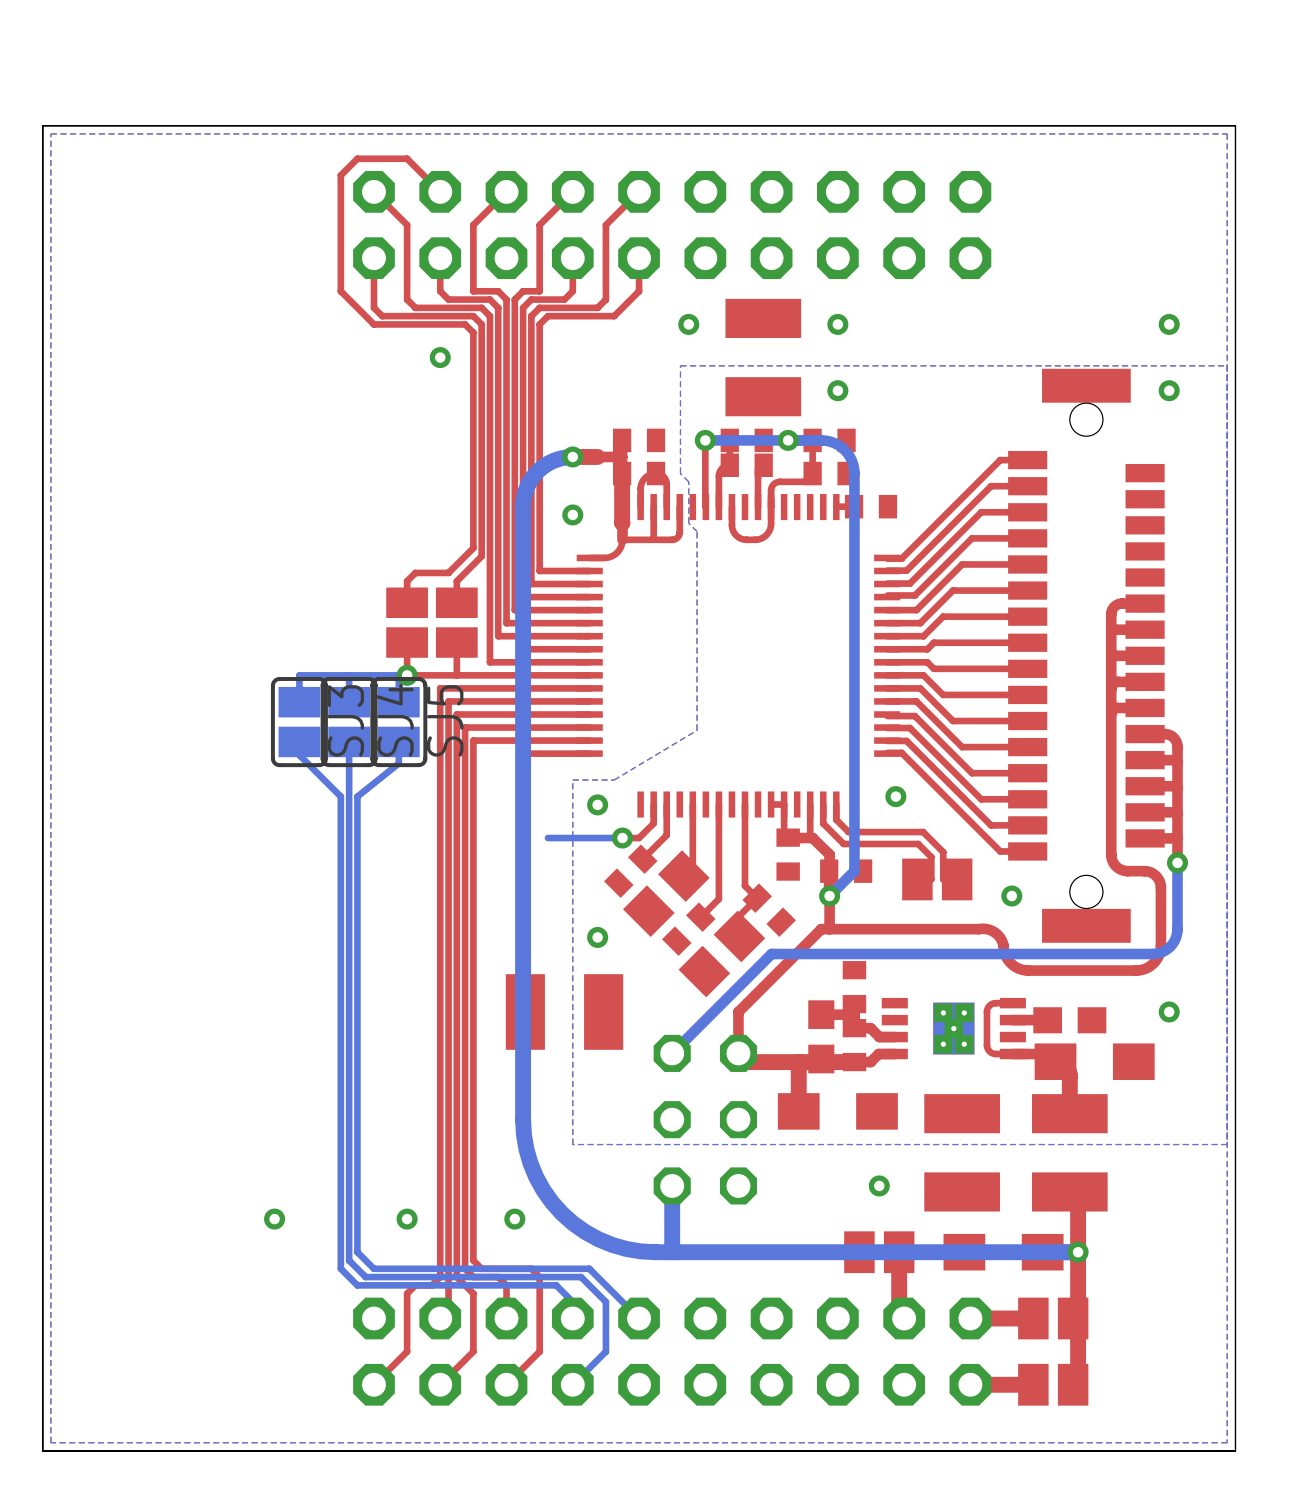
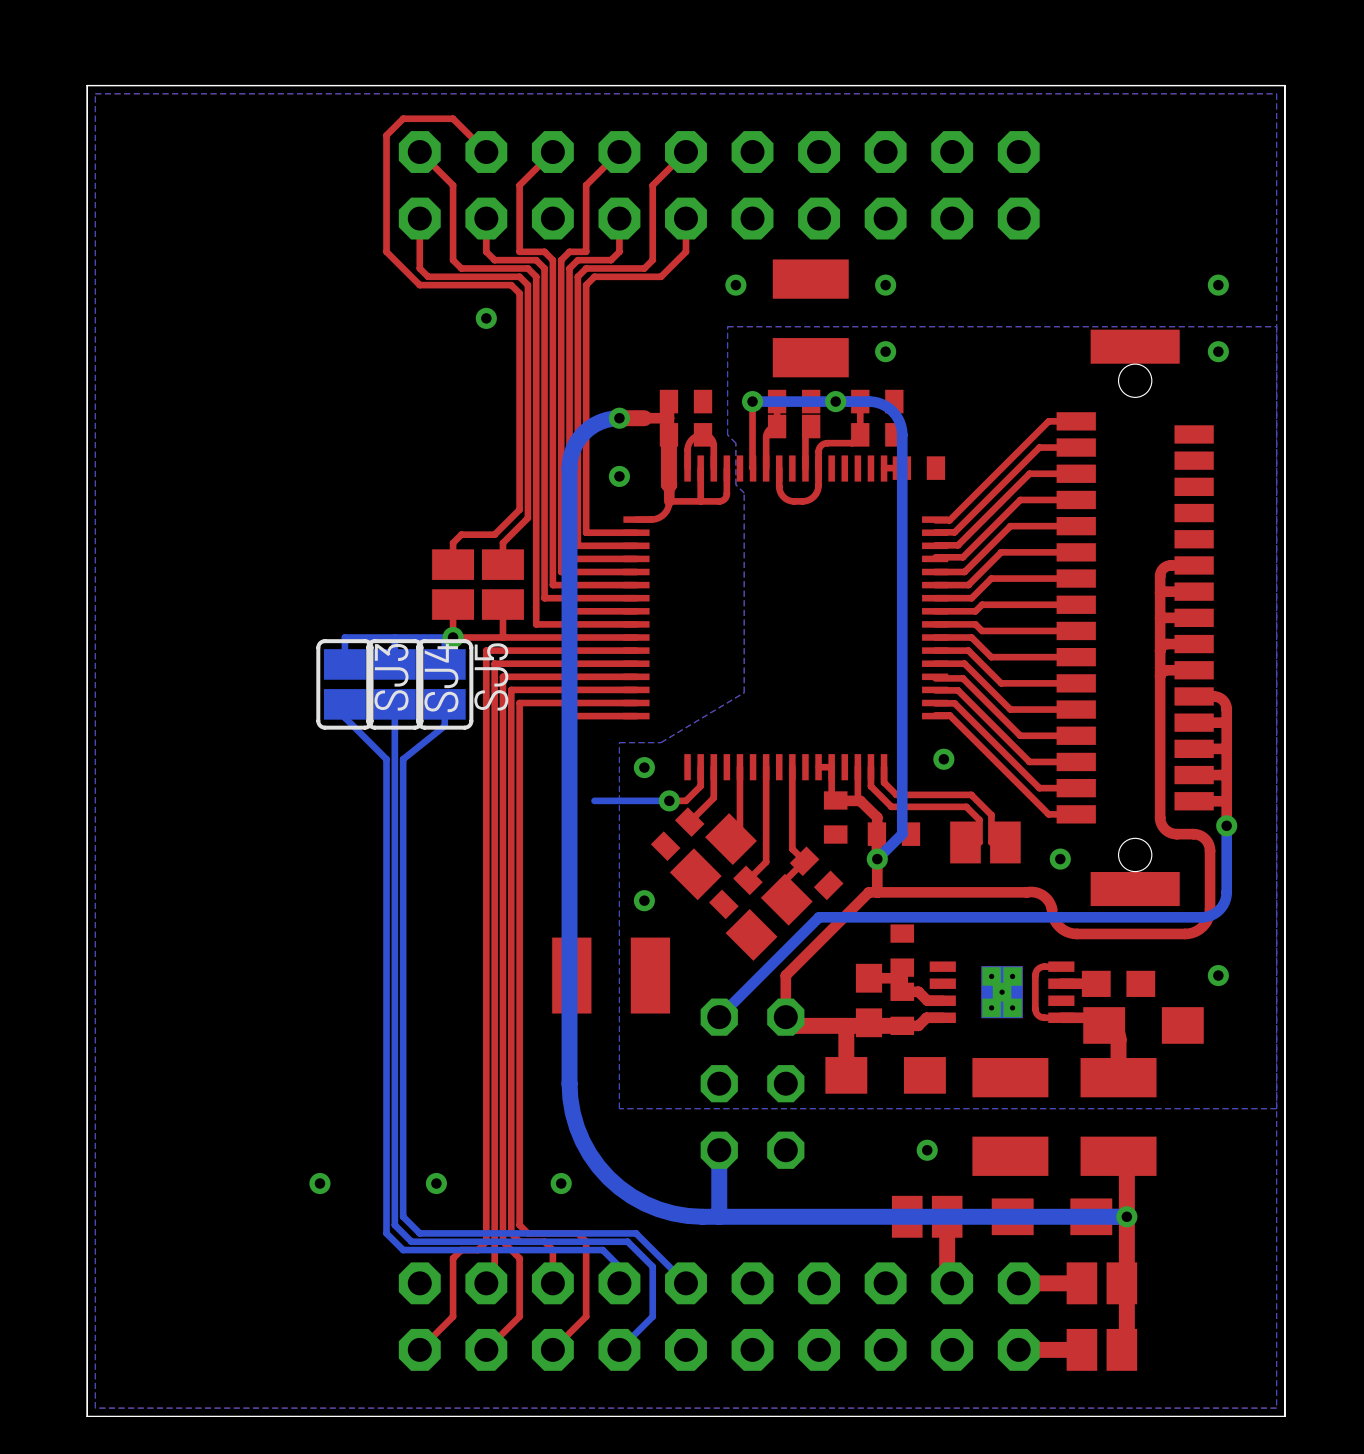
via position: (407, 1219) -> (436, 1183)

